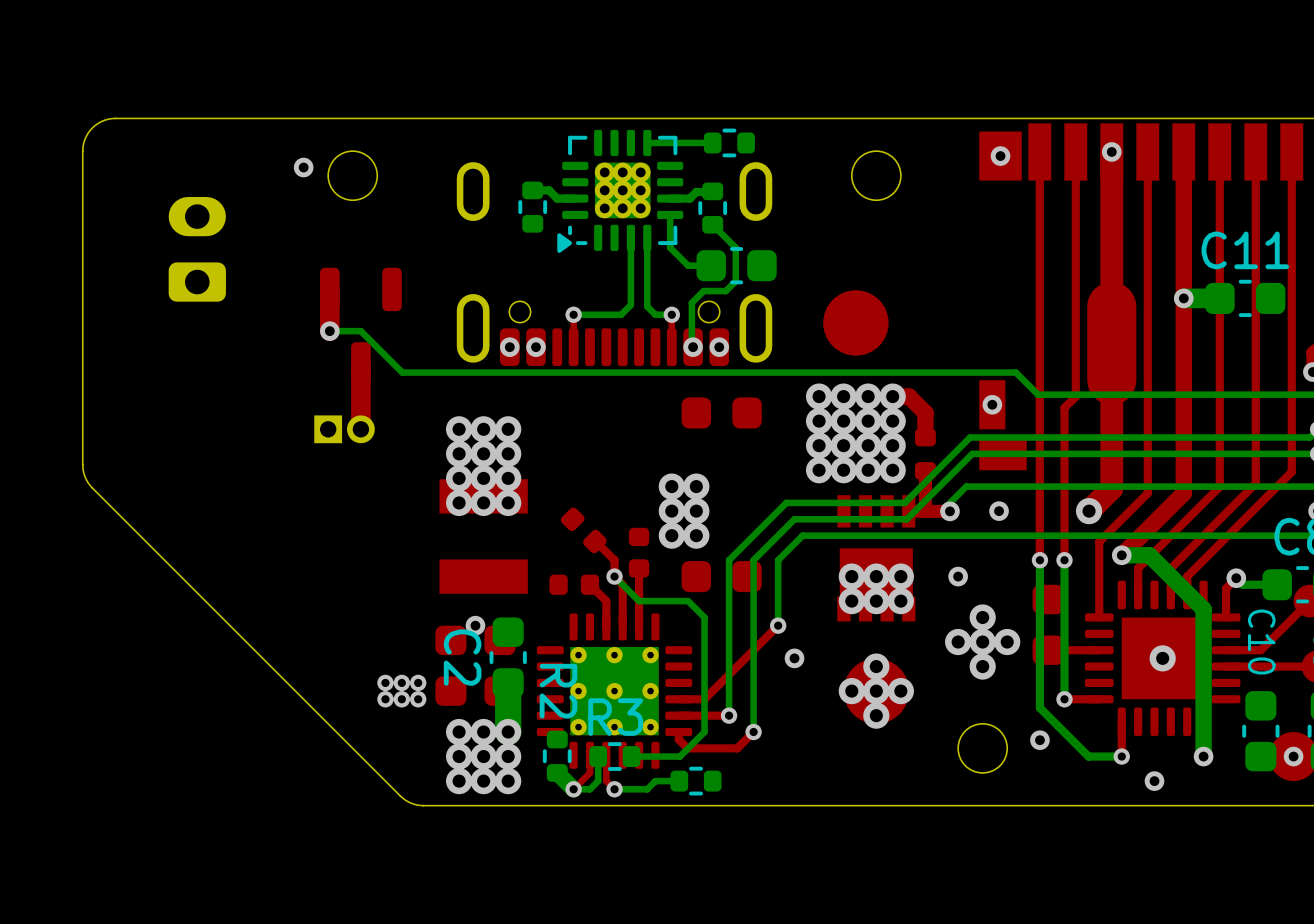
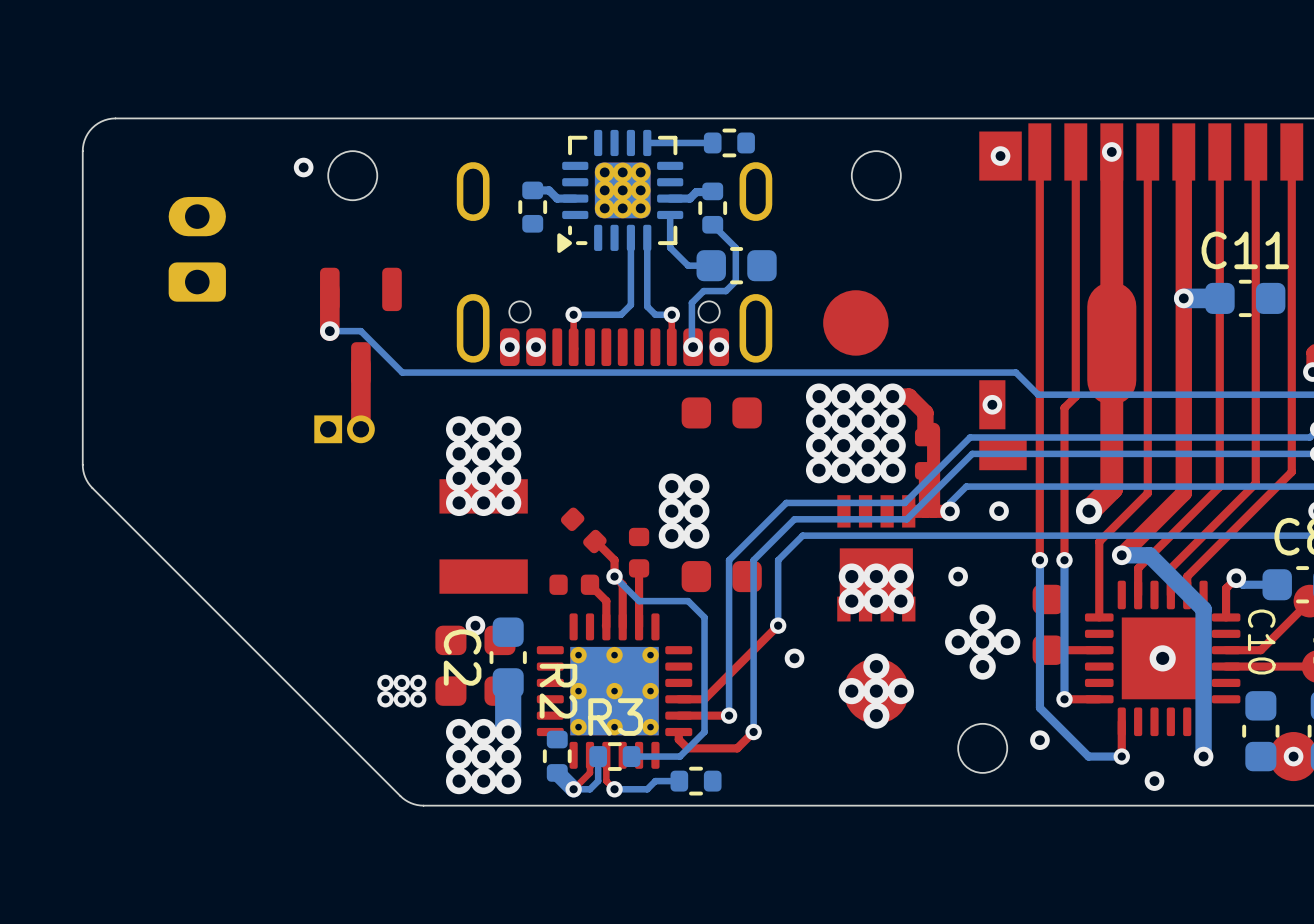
top track: none -> (933, 429) (933, 511)

